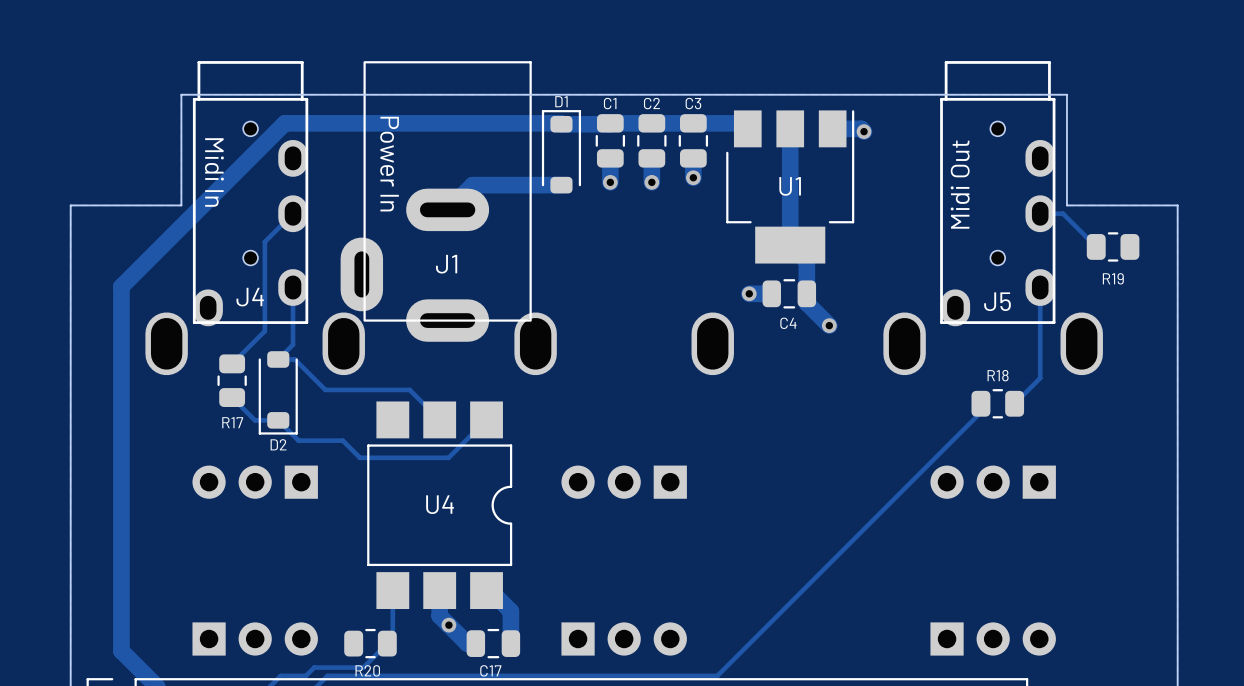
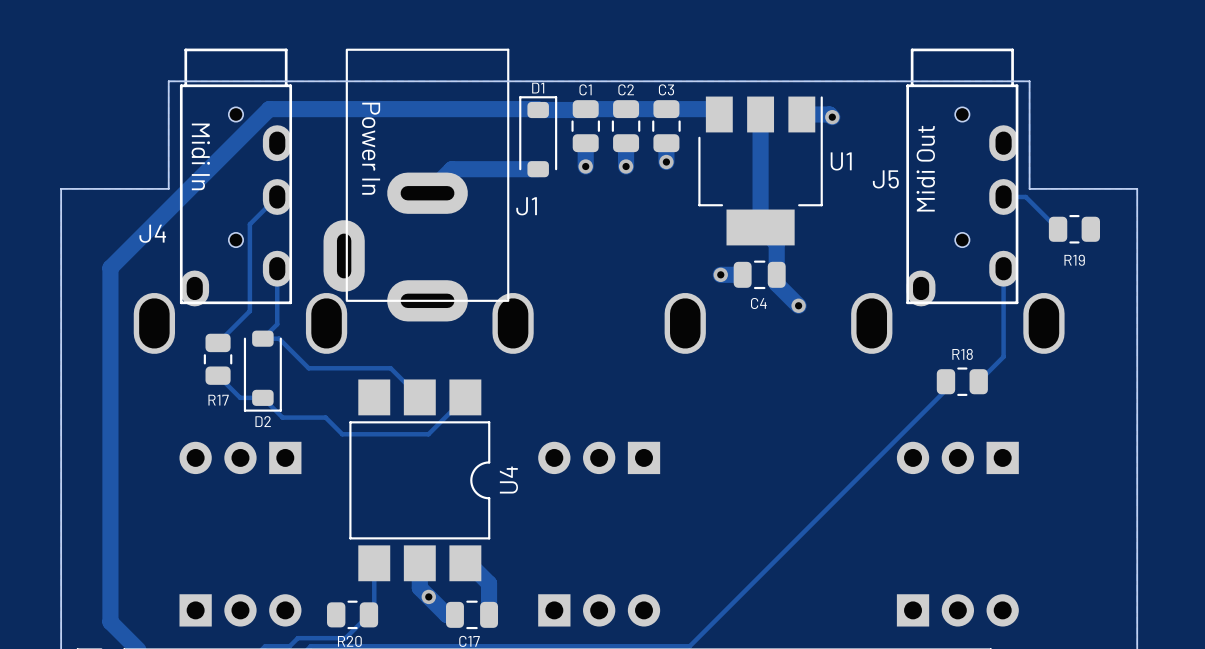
U1 name position: U1 (790, 186) -> U1 (841, 161)
J1 name position: J1 (446, 264) -> J1 (526, 206)
text position: J4 (250, 297) -> J4 (152, 233)
text position: J5 (997, 301) -> J5 (885, 179)
U4 name rotation: 0° (440, 504) -> 90° counterclockwise (508, 480)
U4 name position: U4 (440, 504) -> U4 (508, 480)

